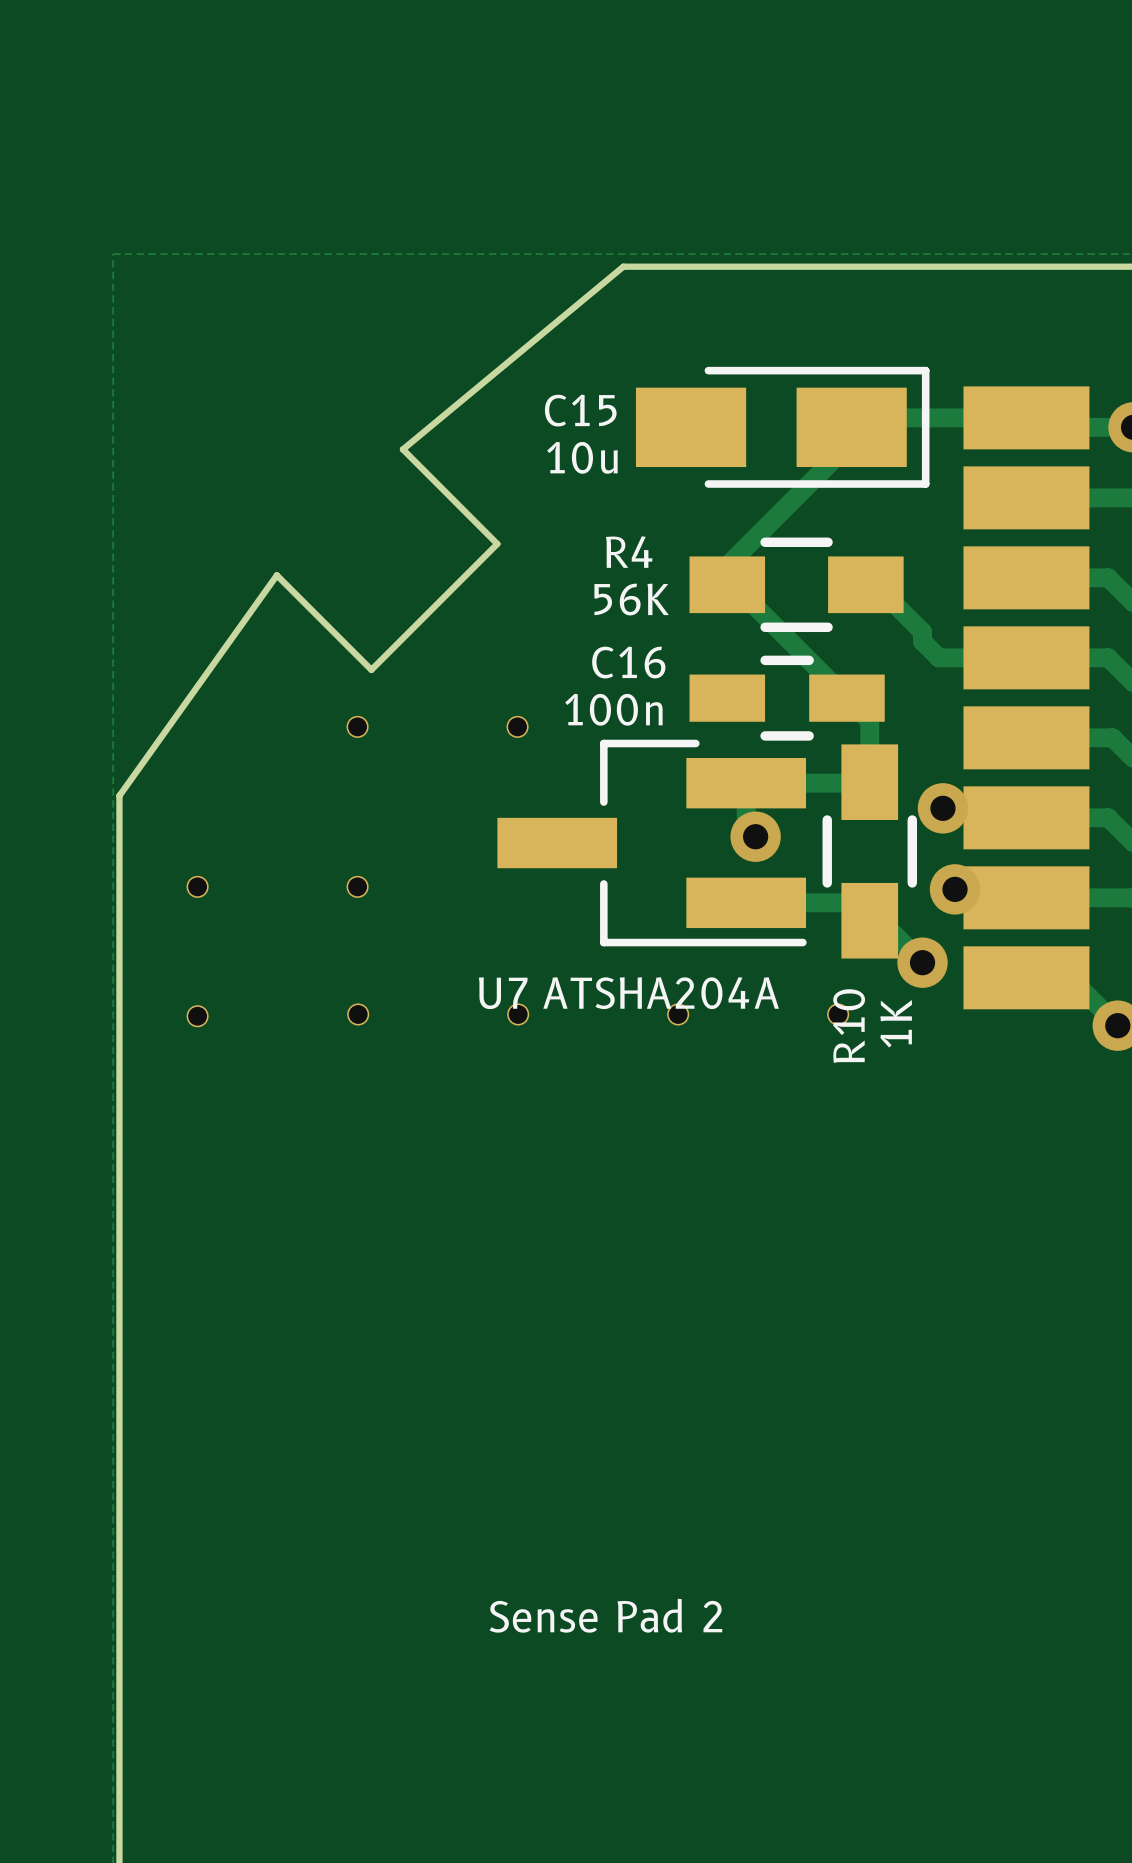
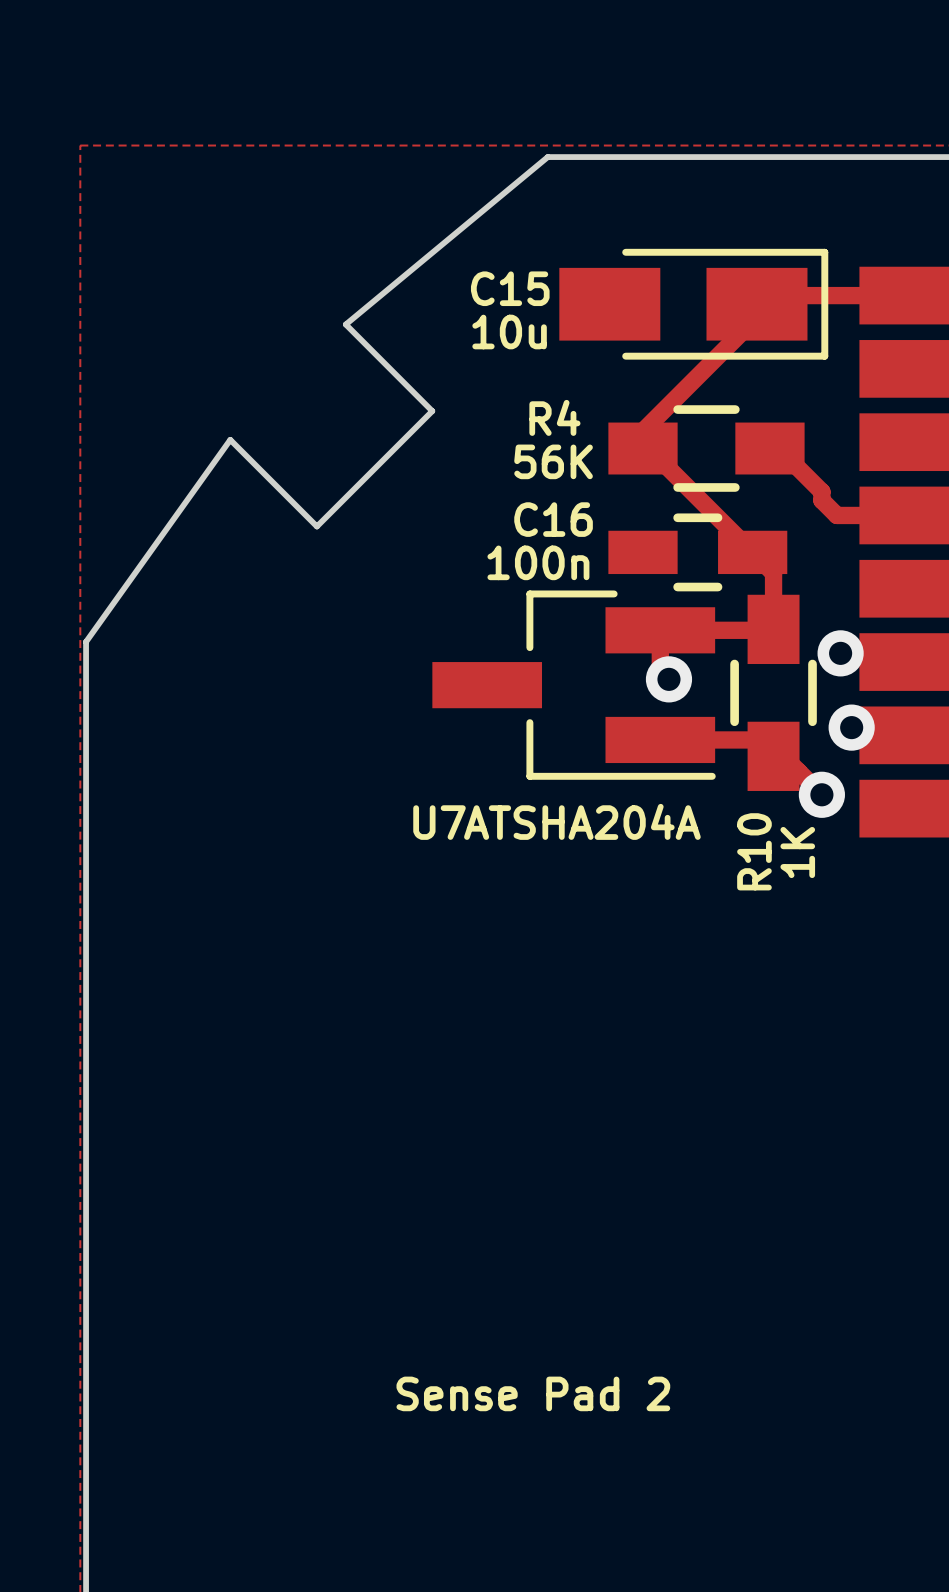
part: (357, 726) -> none
part: (517, 726) -> none
part: (197, 886) -> none
part: (357, 886) -> none
part: (358, 1014) -> none
part: (518, 1014) -> none
part: (678, 1014) -> none
part: (838, 1014) -> none
part: (197, 1016) -> none

